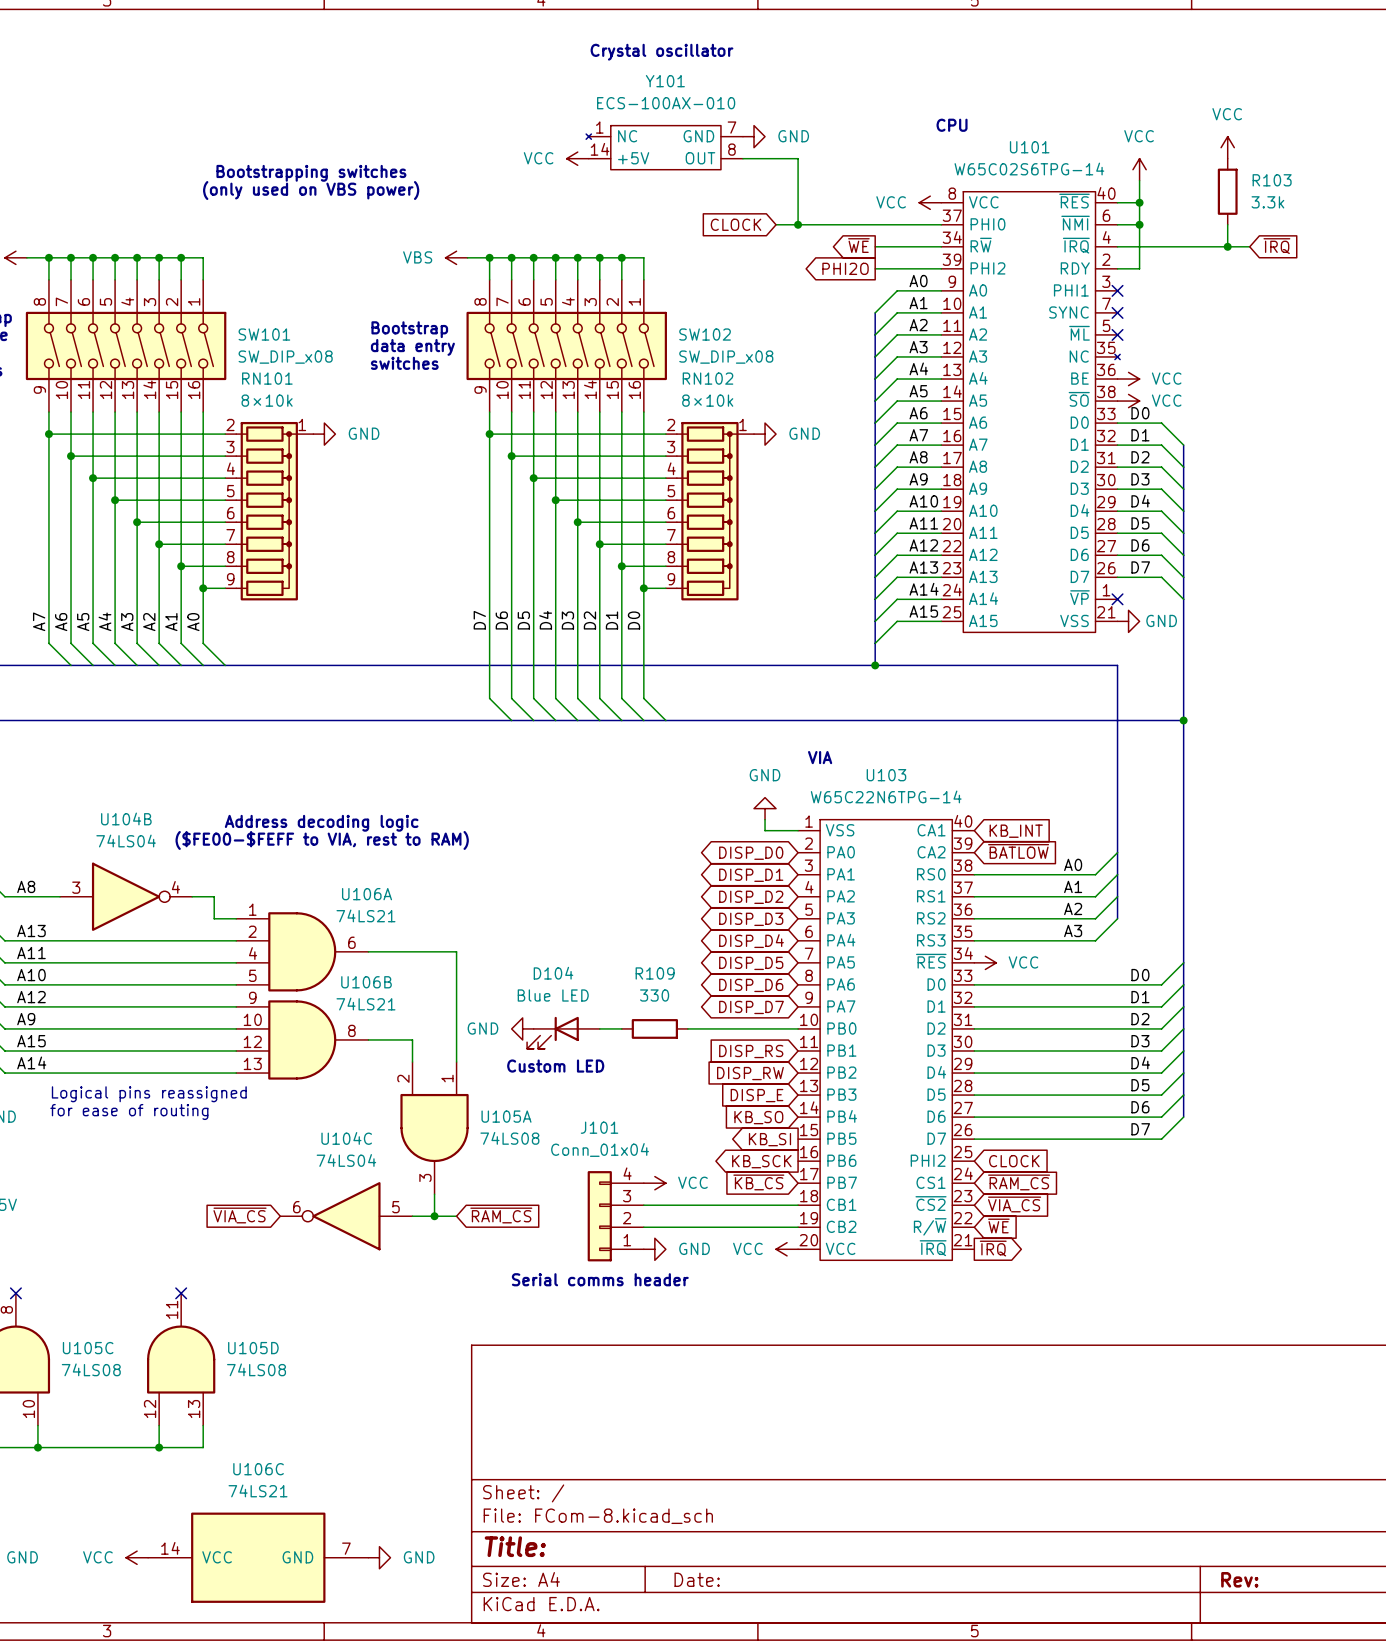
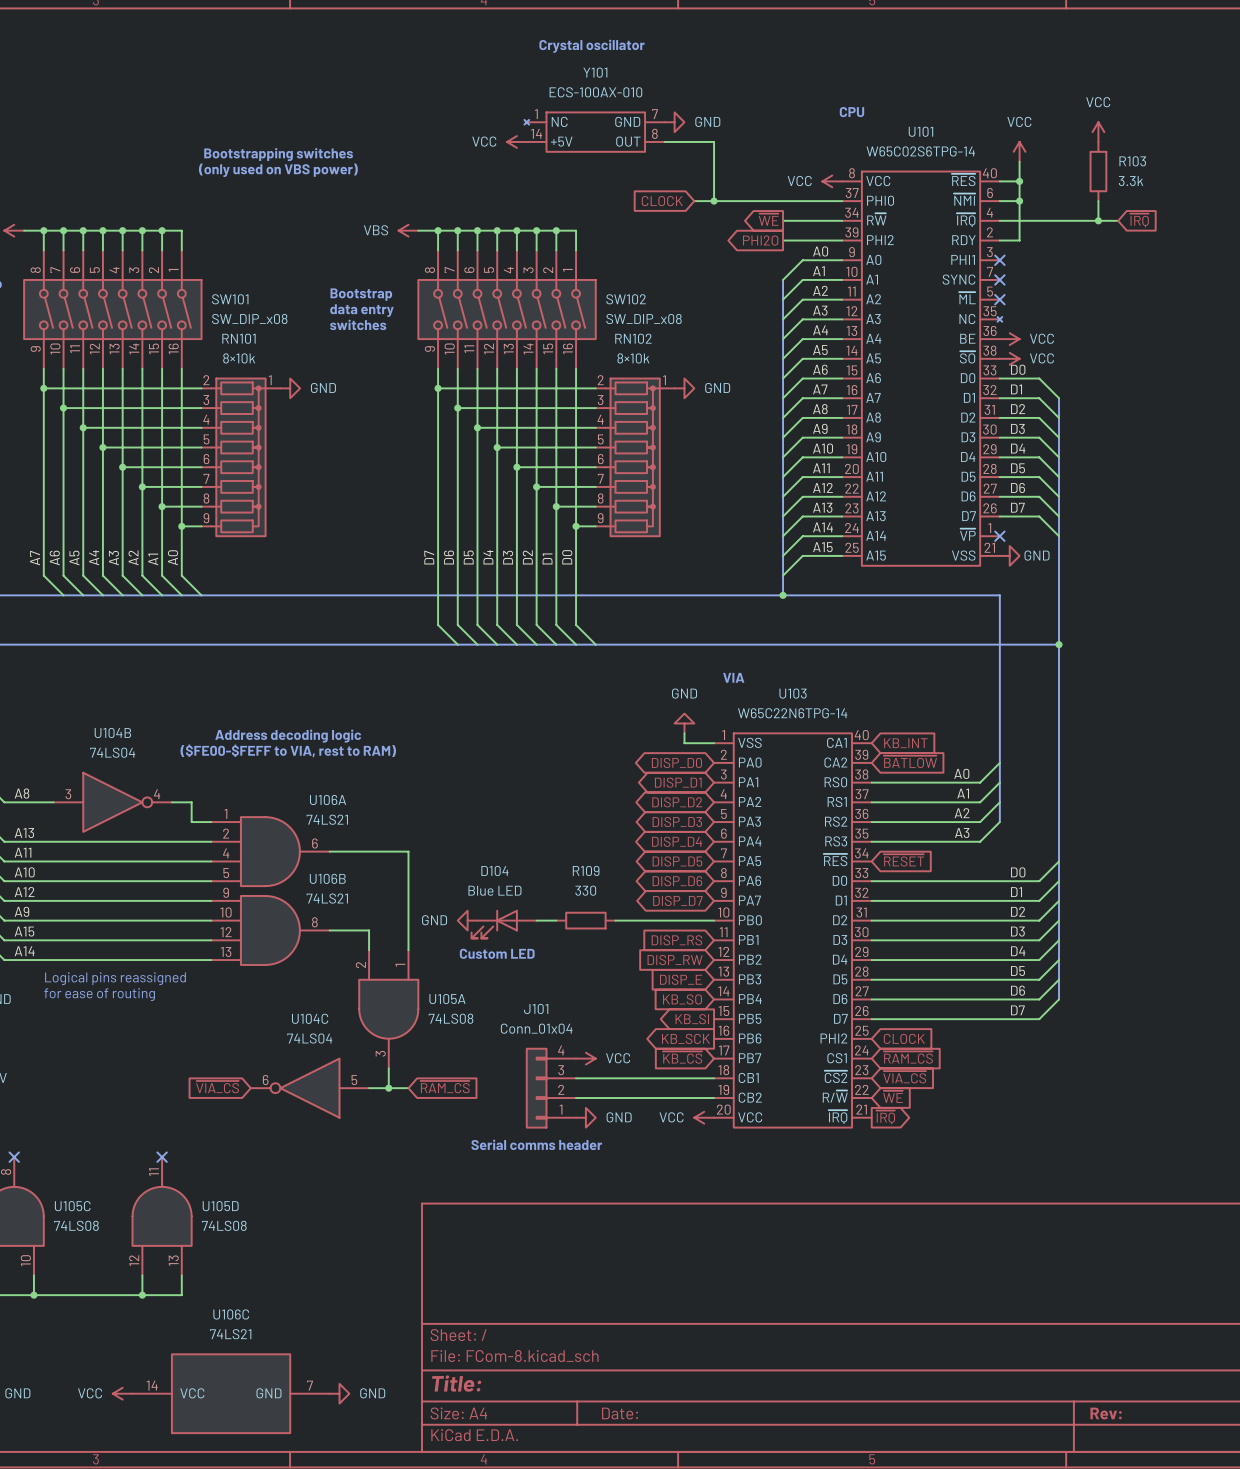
global label: none -> ~{RESET} (903, 860)
power symbol: VCC (985, 962) -> none

